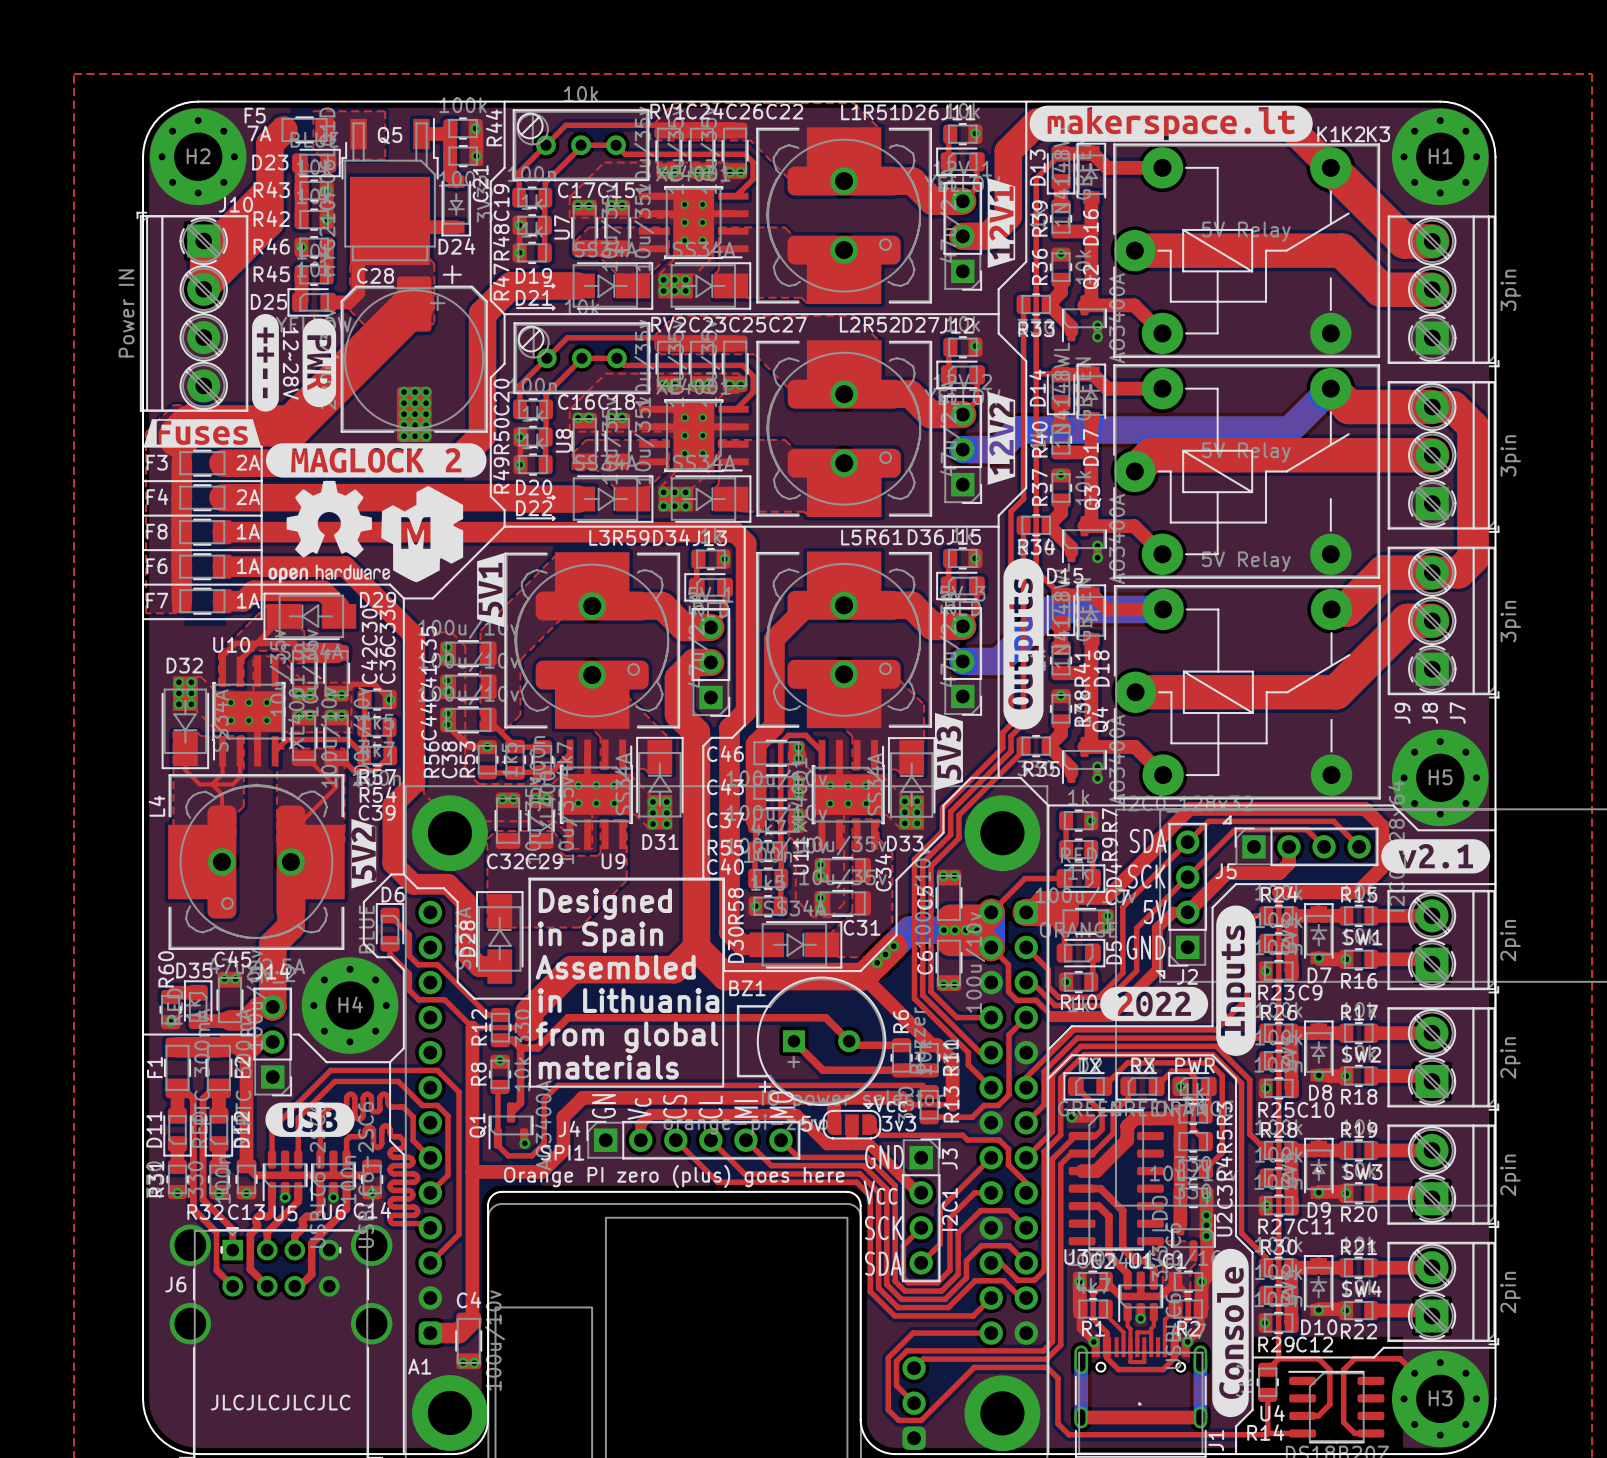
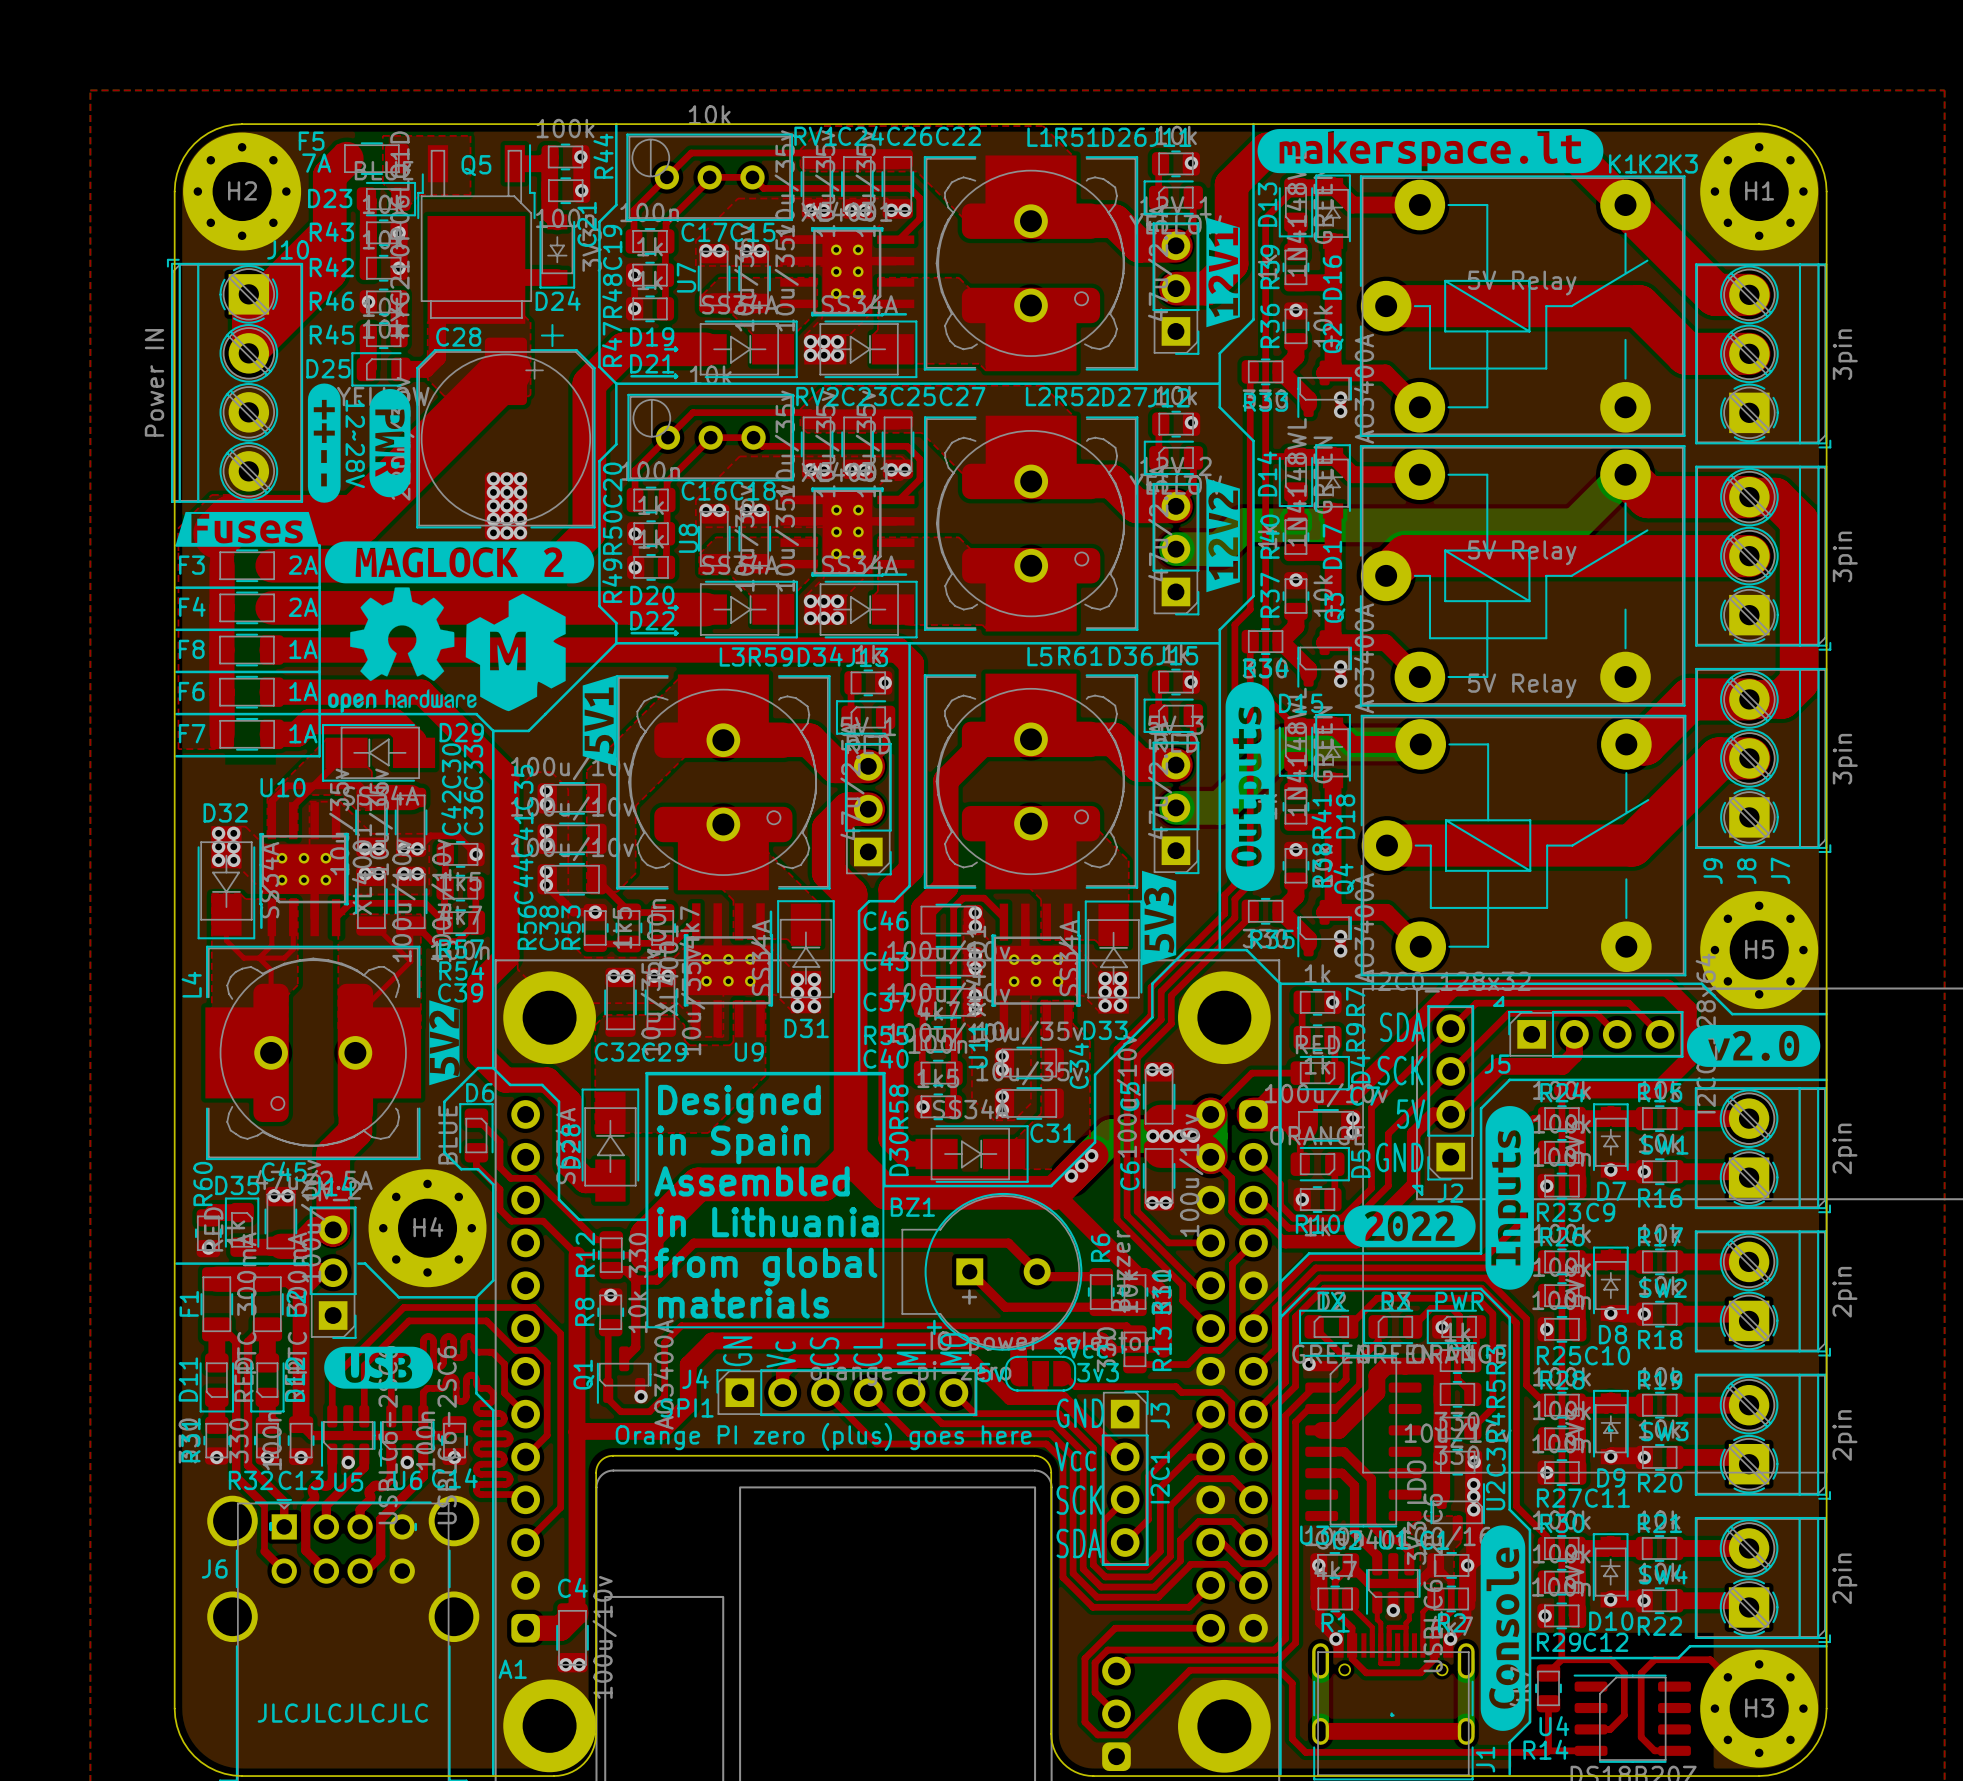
RV1 footprint: [512, 109, 650, 181] -> [626, 133, 794, 222]
RV2 footprint: [513, 322, 651, 395] -> [627, 393, 795, 482]
drawing shape: [1381, 839, 1491, 874] -> [1686, 1024, 1821, 1067]
BZ1 footprint: [737, 976, 887, 1106] -> [901, 1192, 1083, 1351]

